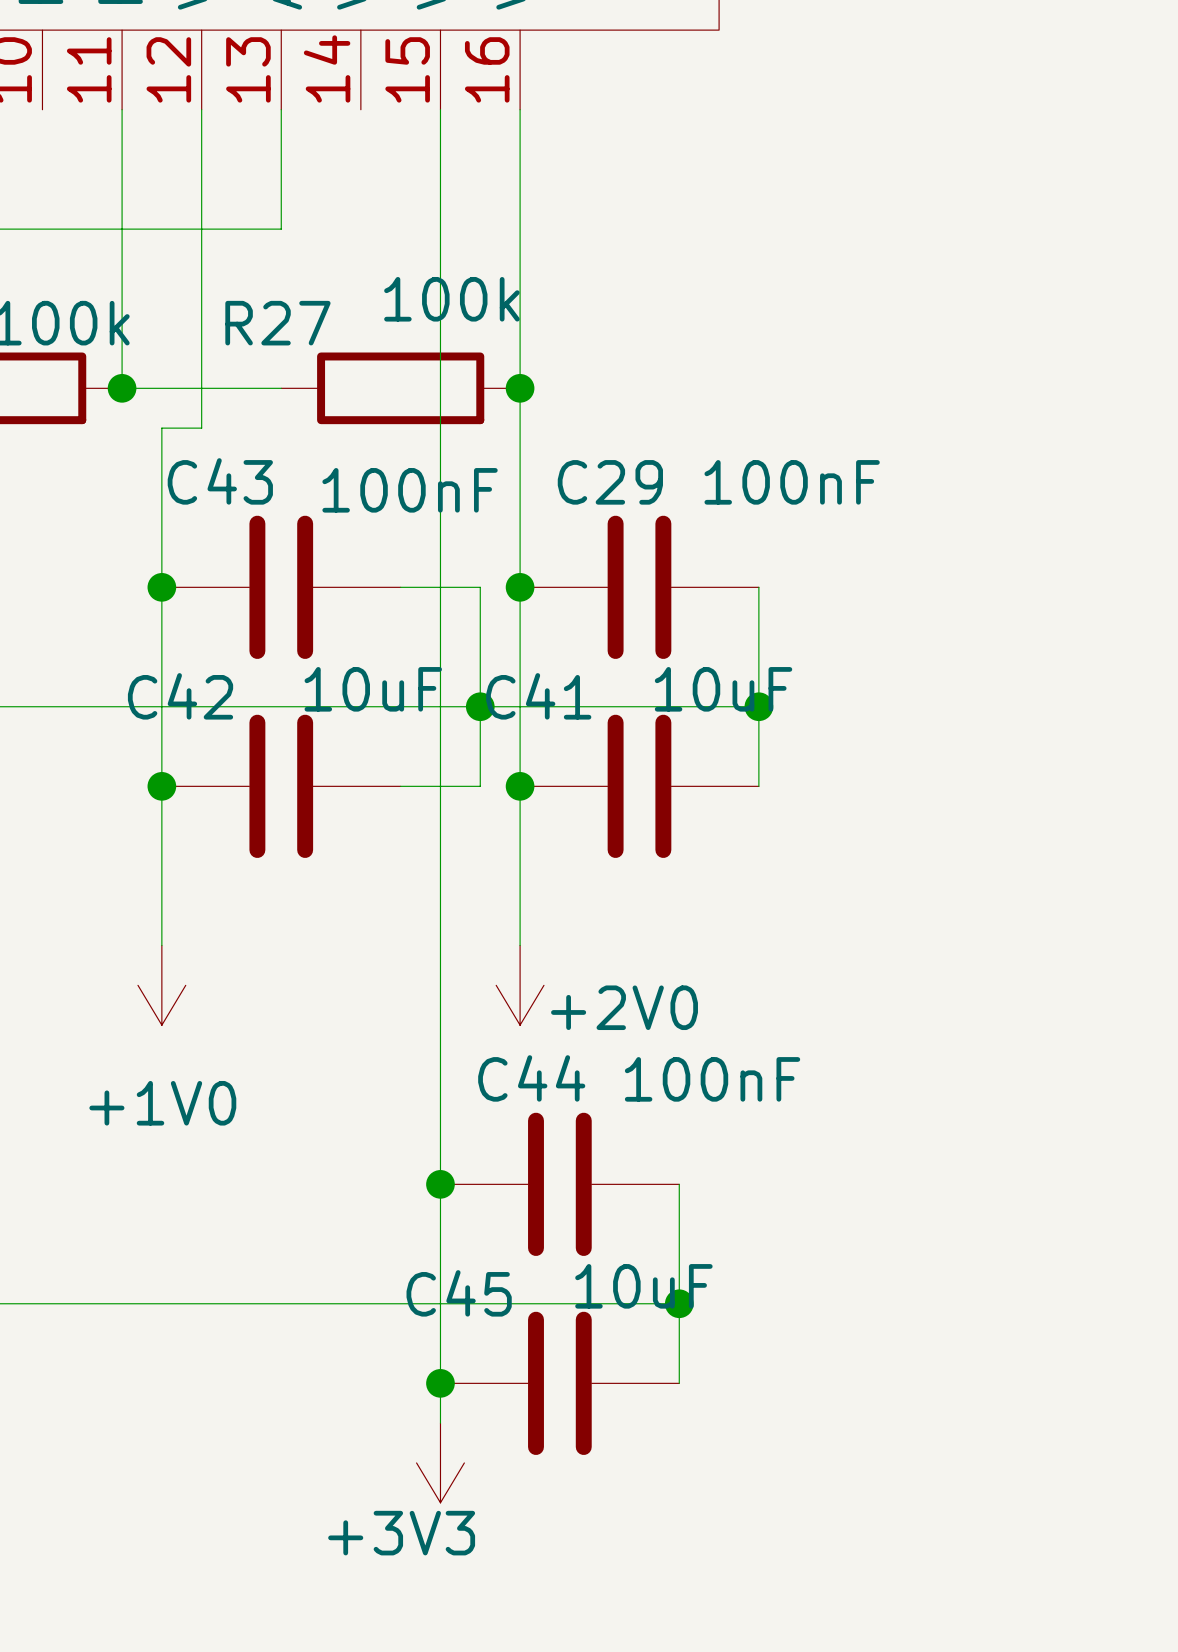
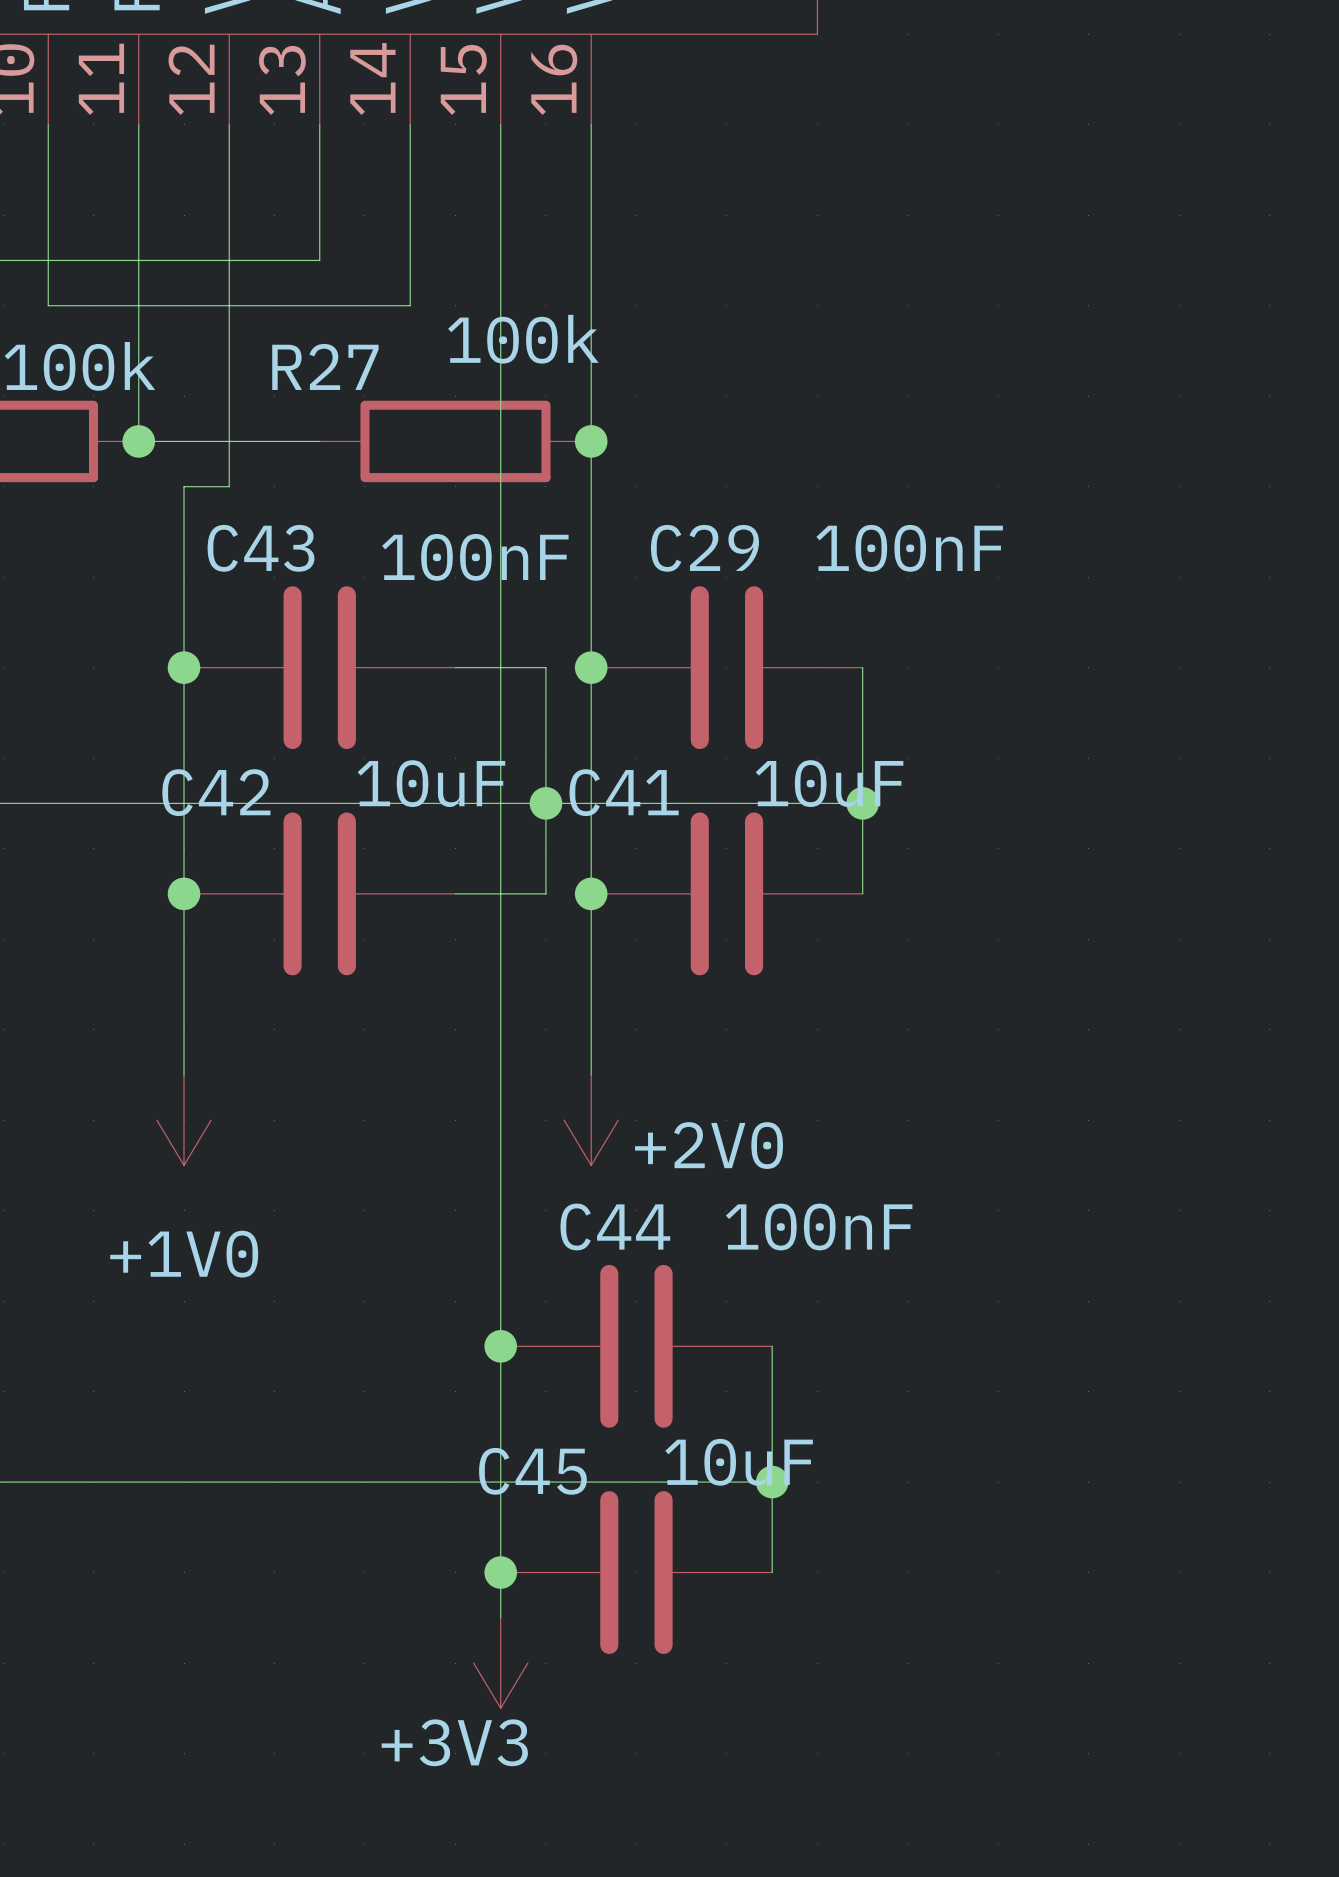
wire: none -> (48, 124) (48, 305) (410, 305) (410, 124)

